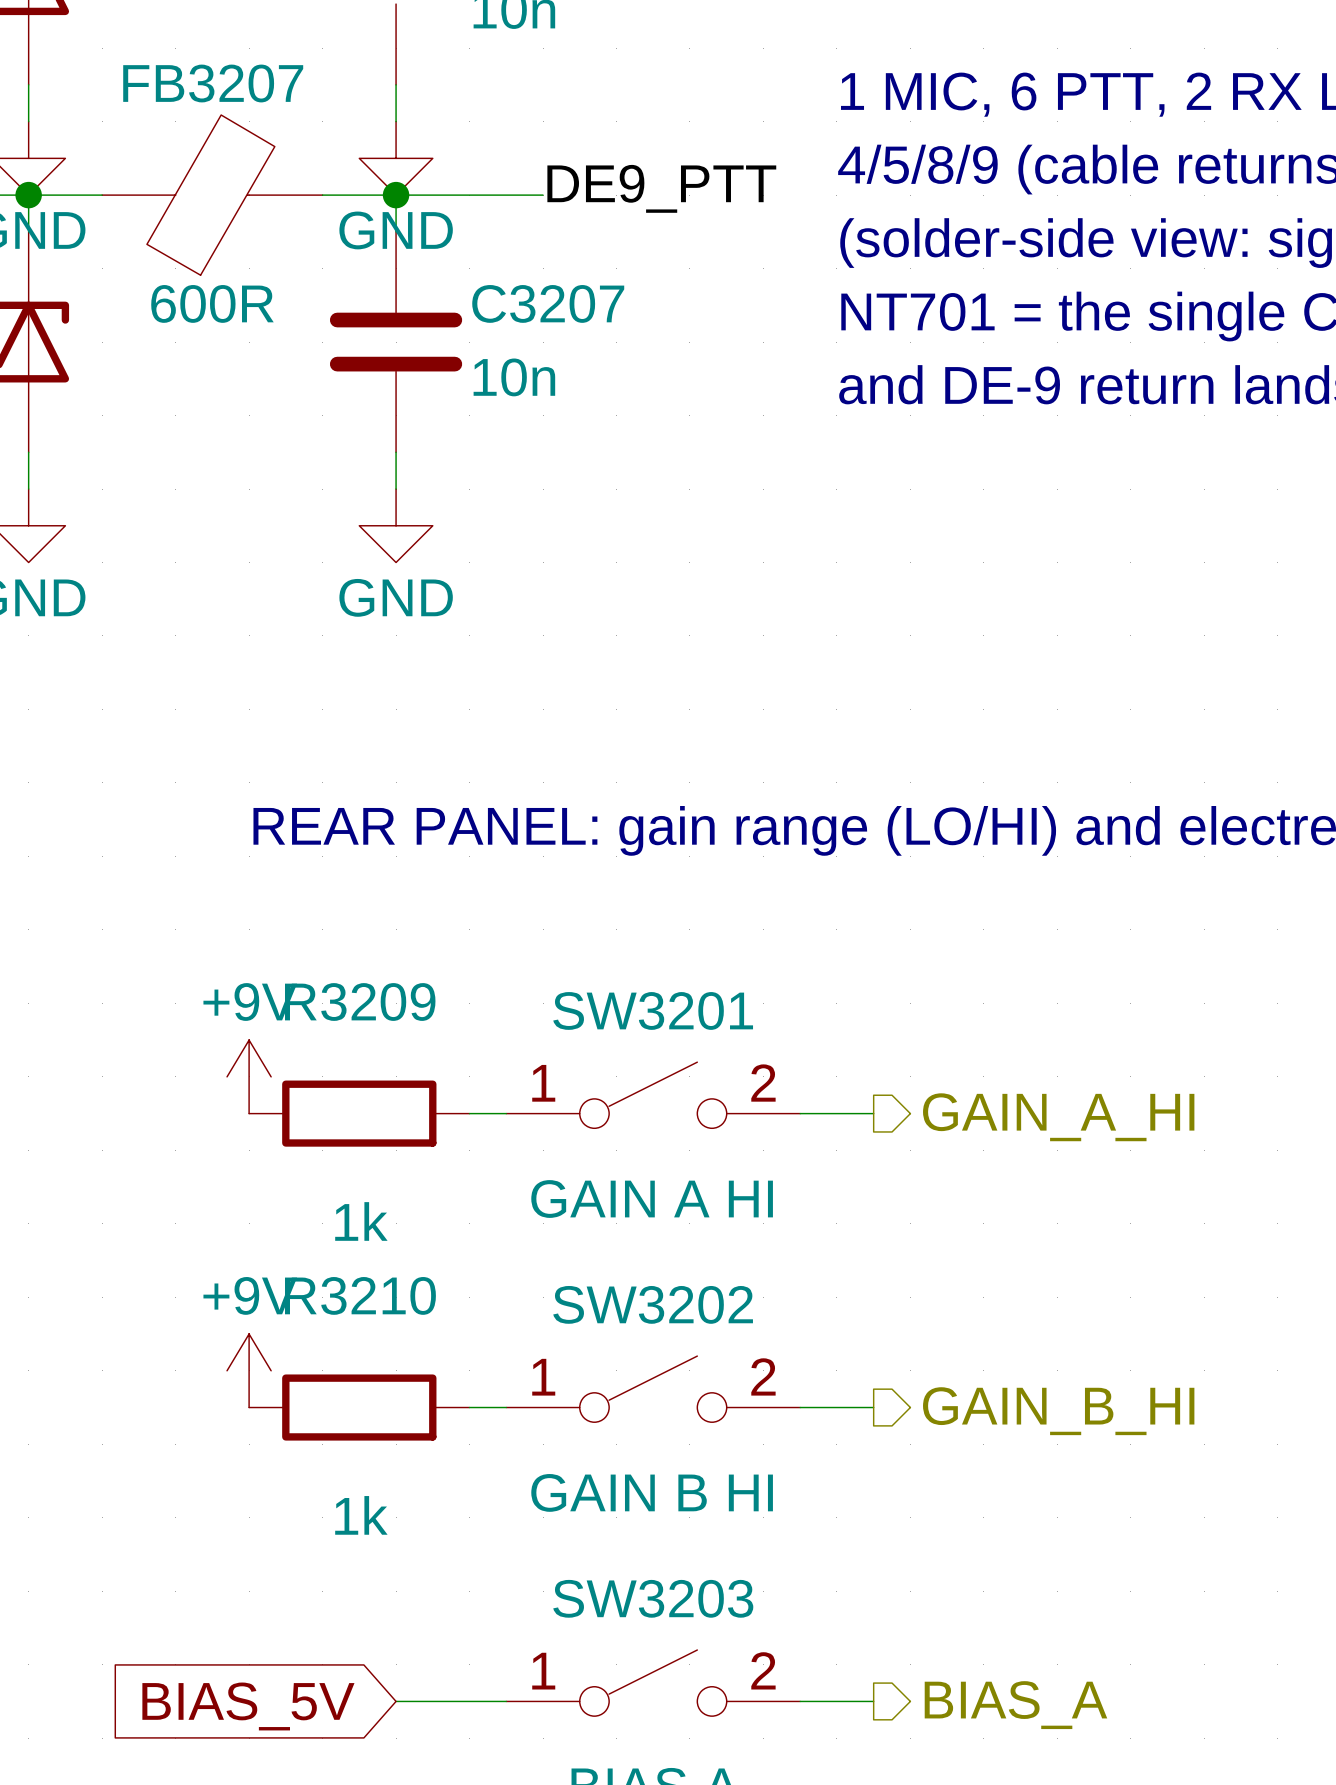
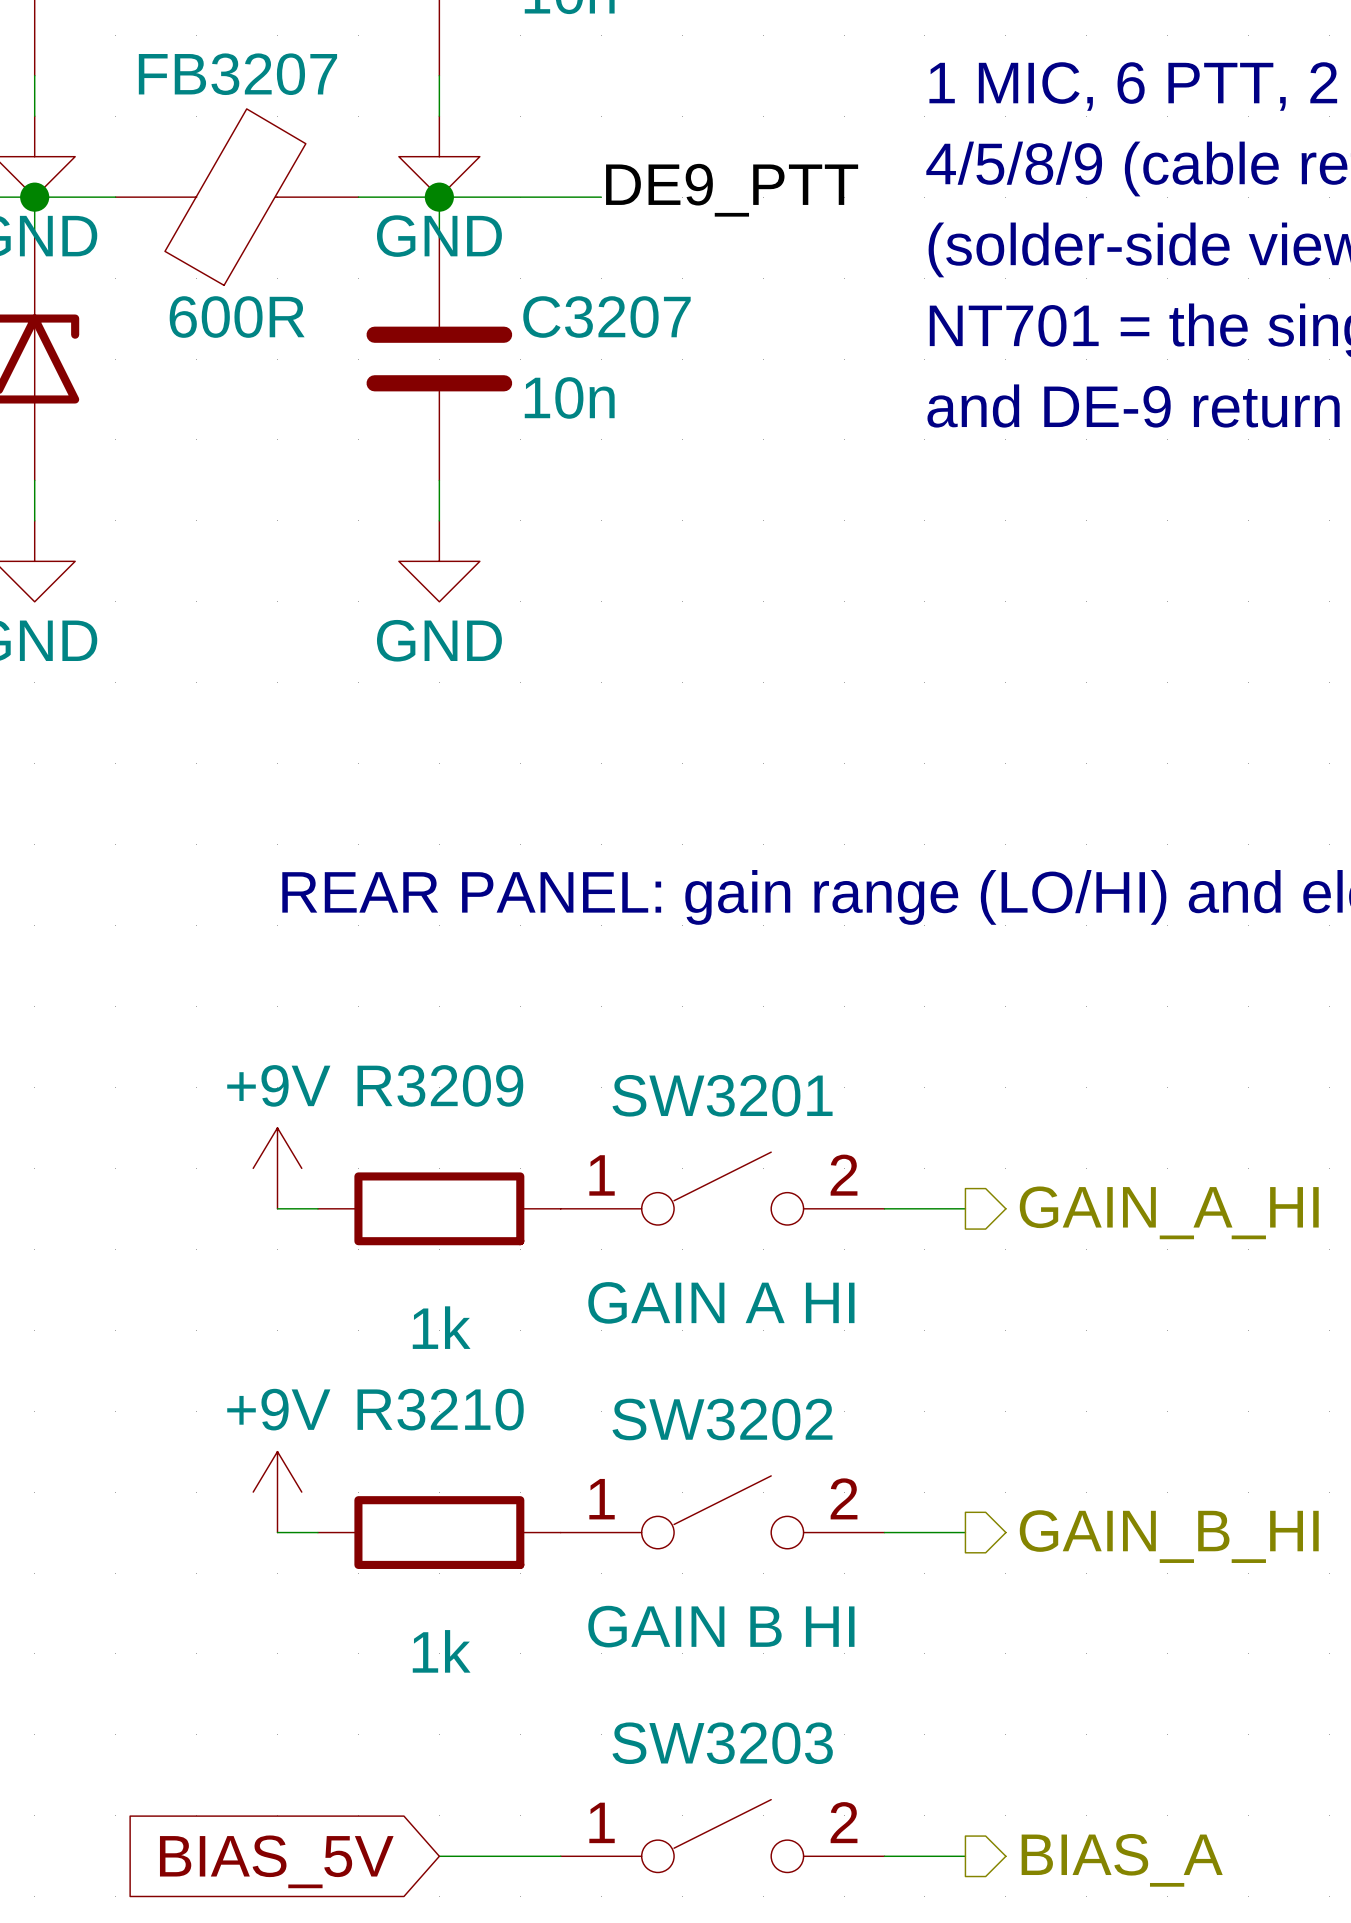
R3209 position: (359, 1113) -> (439, 1208)
R3210 position: (359, 1407) -> (439, 1532)

